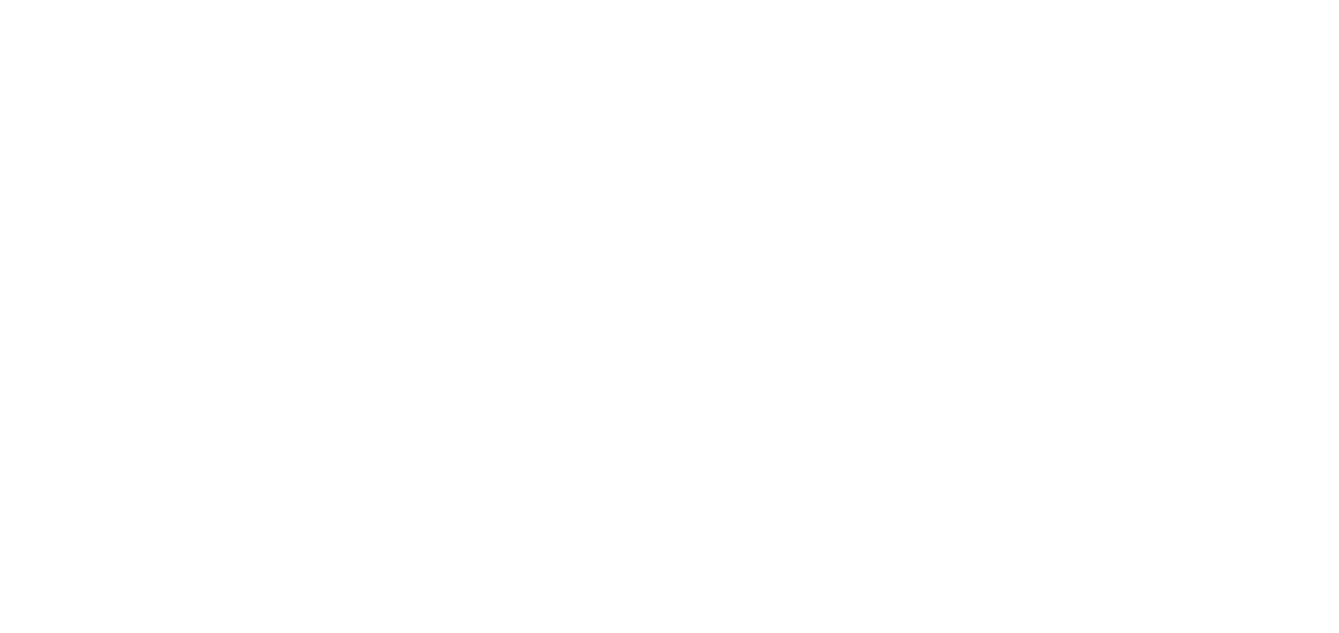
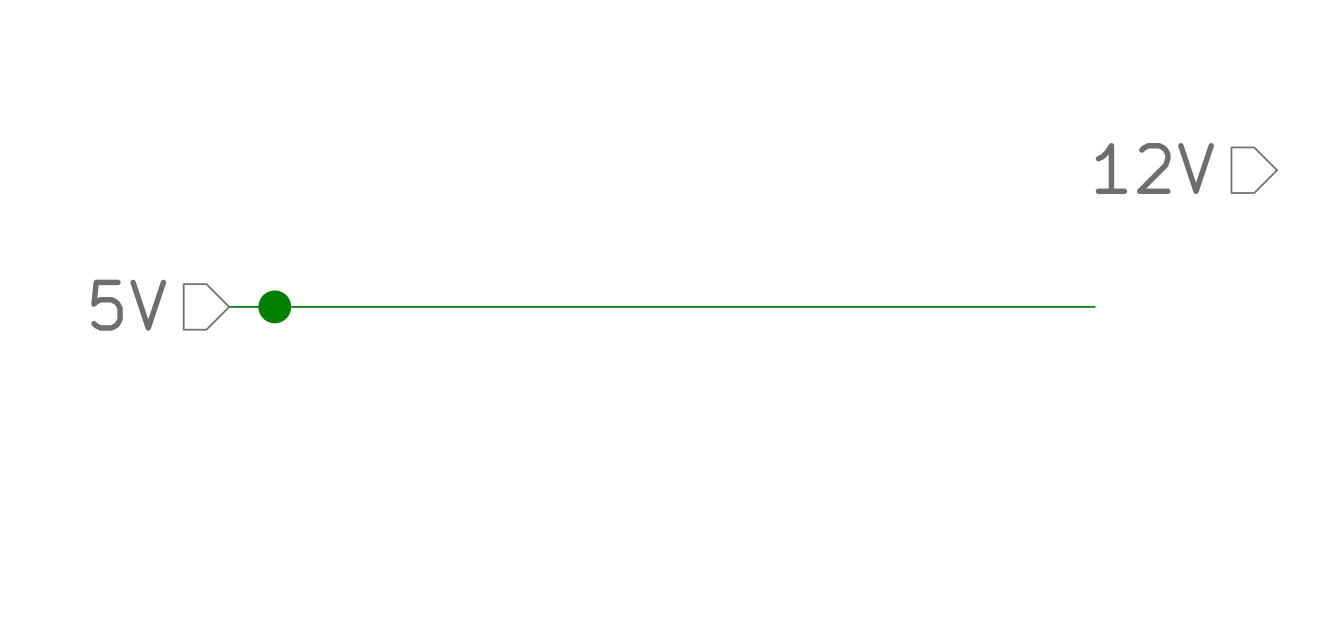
hierarchical label: none -> 12V (1154, 168)
hierarchical label: none -> 5V (128, 305)
wire: none -> (229, 306) (1094, 306)
junction: none -> (274, 306)

